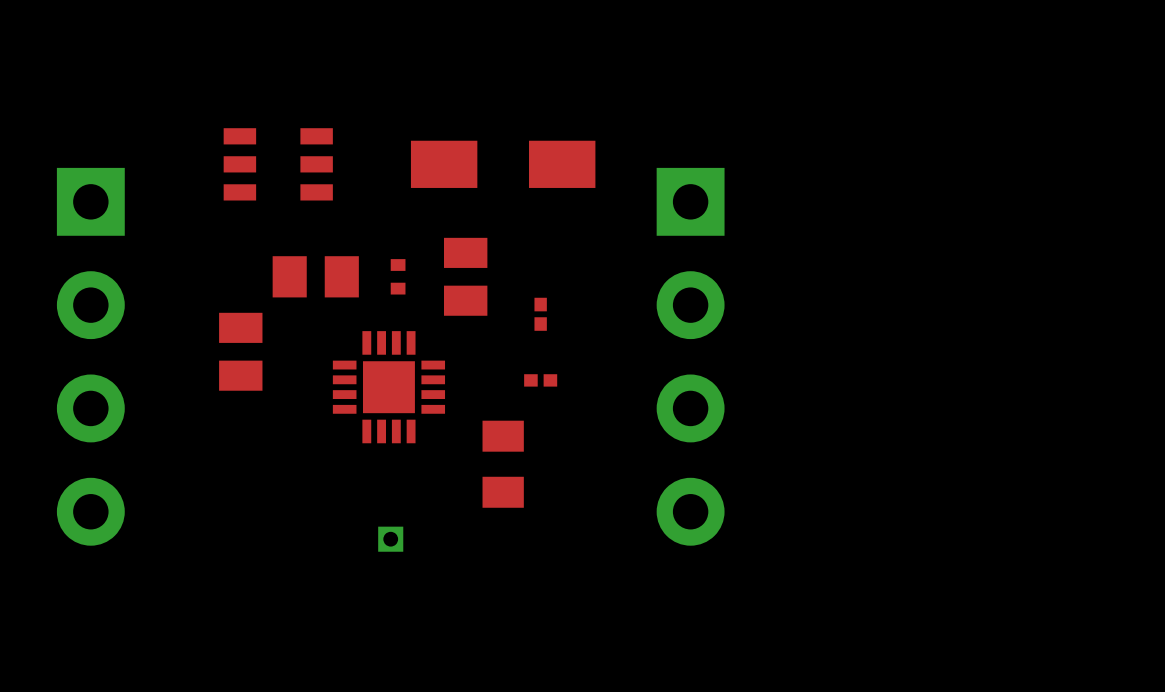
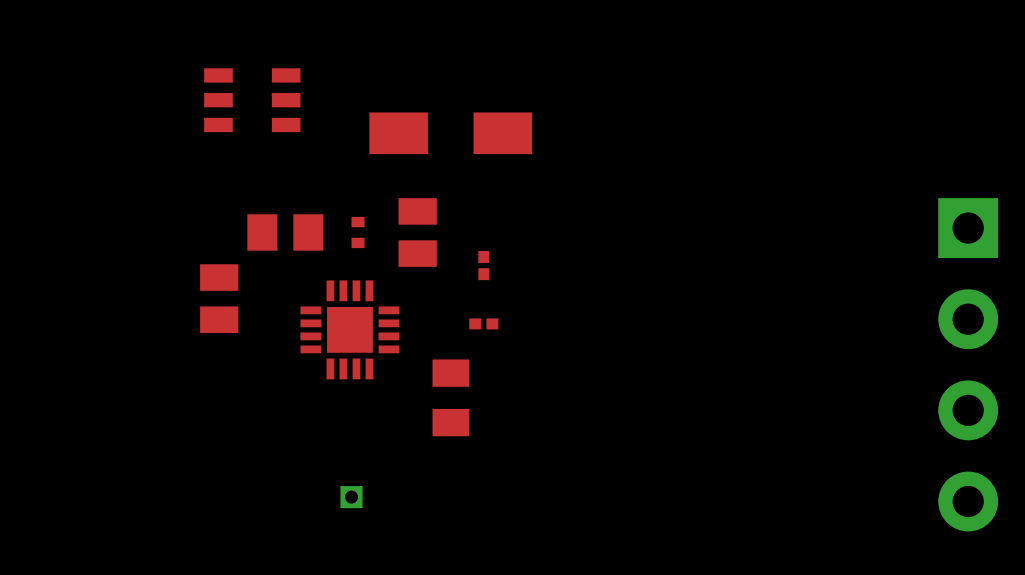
part position: (278, 164) -> (252, 100)
part: (90, 356) -> none
part position: (690, 356) -> (968, 364)
part position: (390, 539) -> (351, 497)

